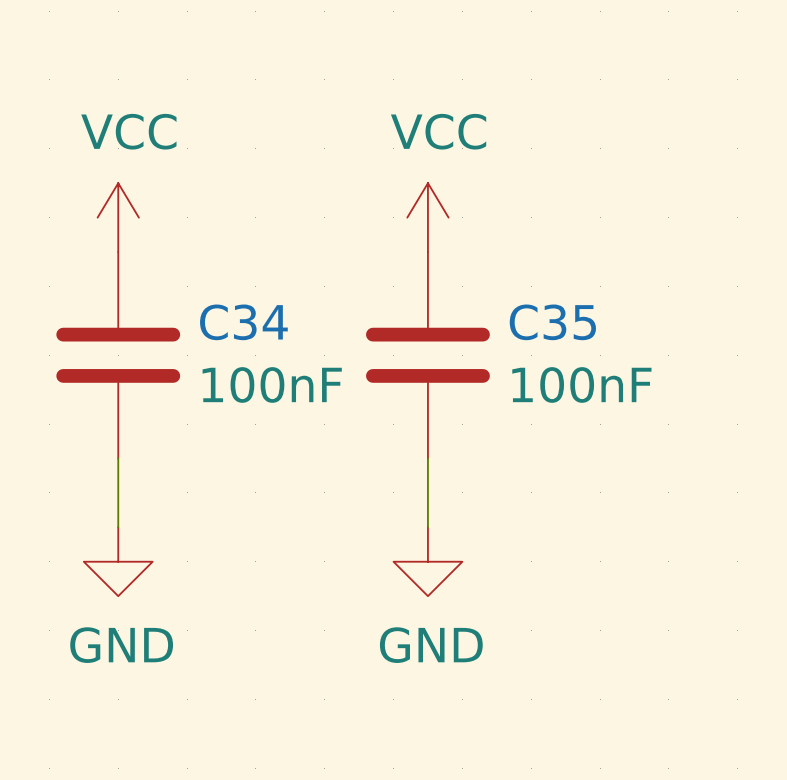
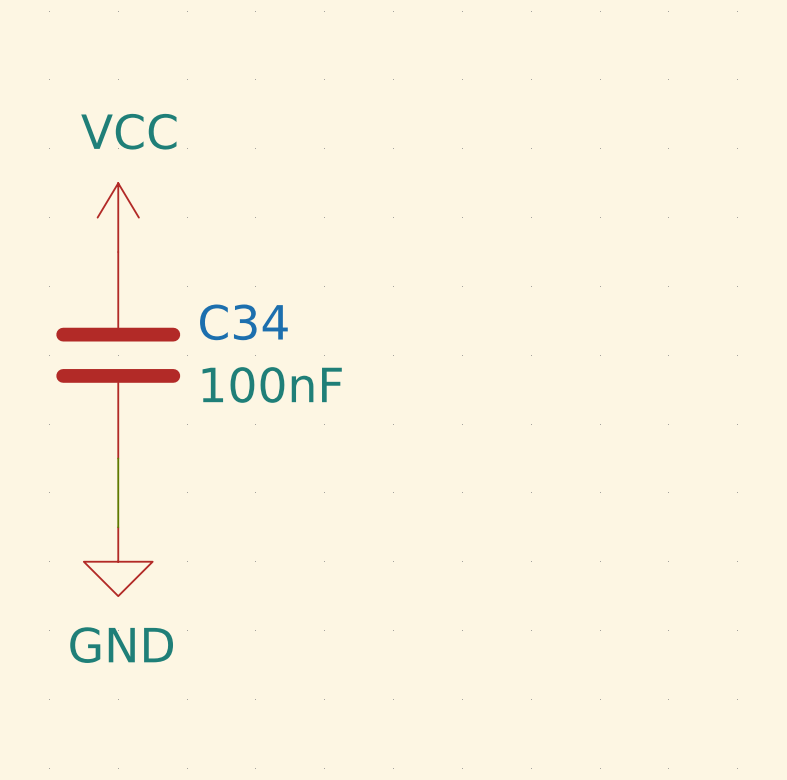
power symbol: VCC (427, 217) -> none
C35: 100nF (427, 355) -> none
wire: (427, 458) (427, 527) -> none
power symbol: GND (427, 561) -> none

